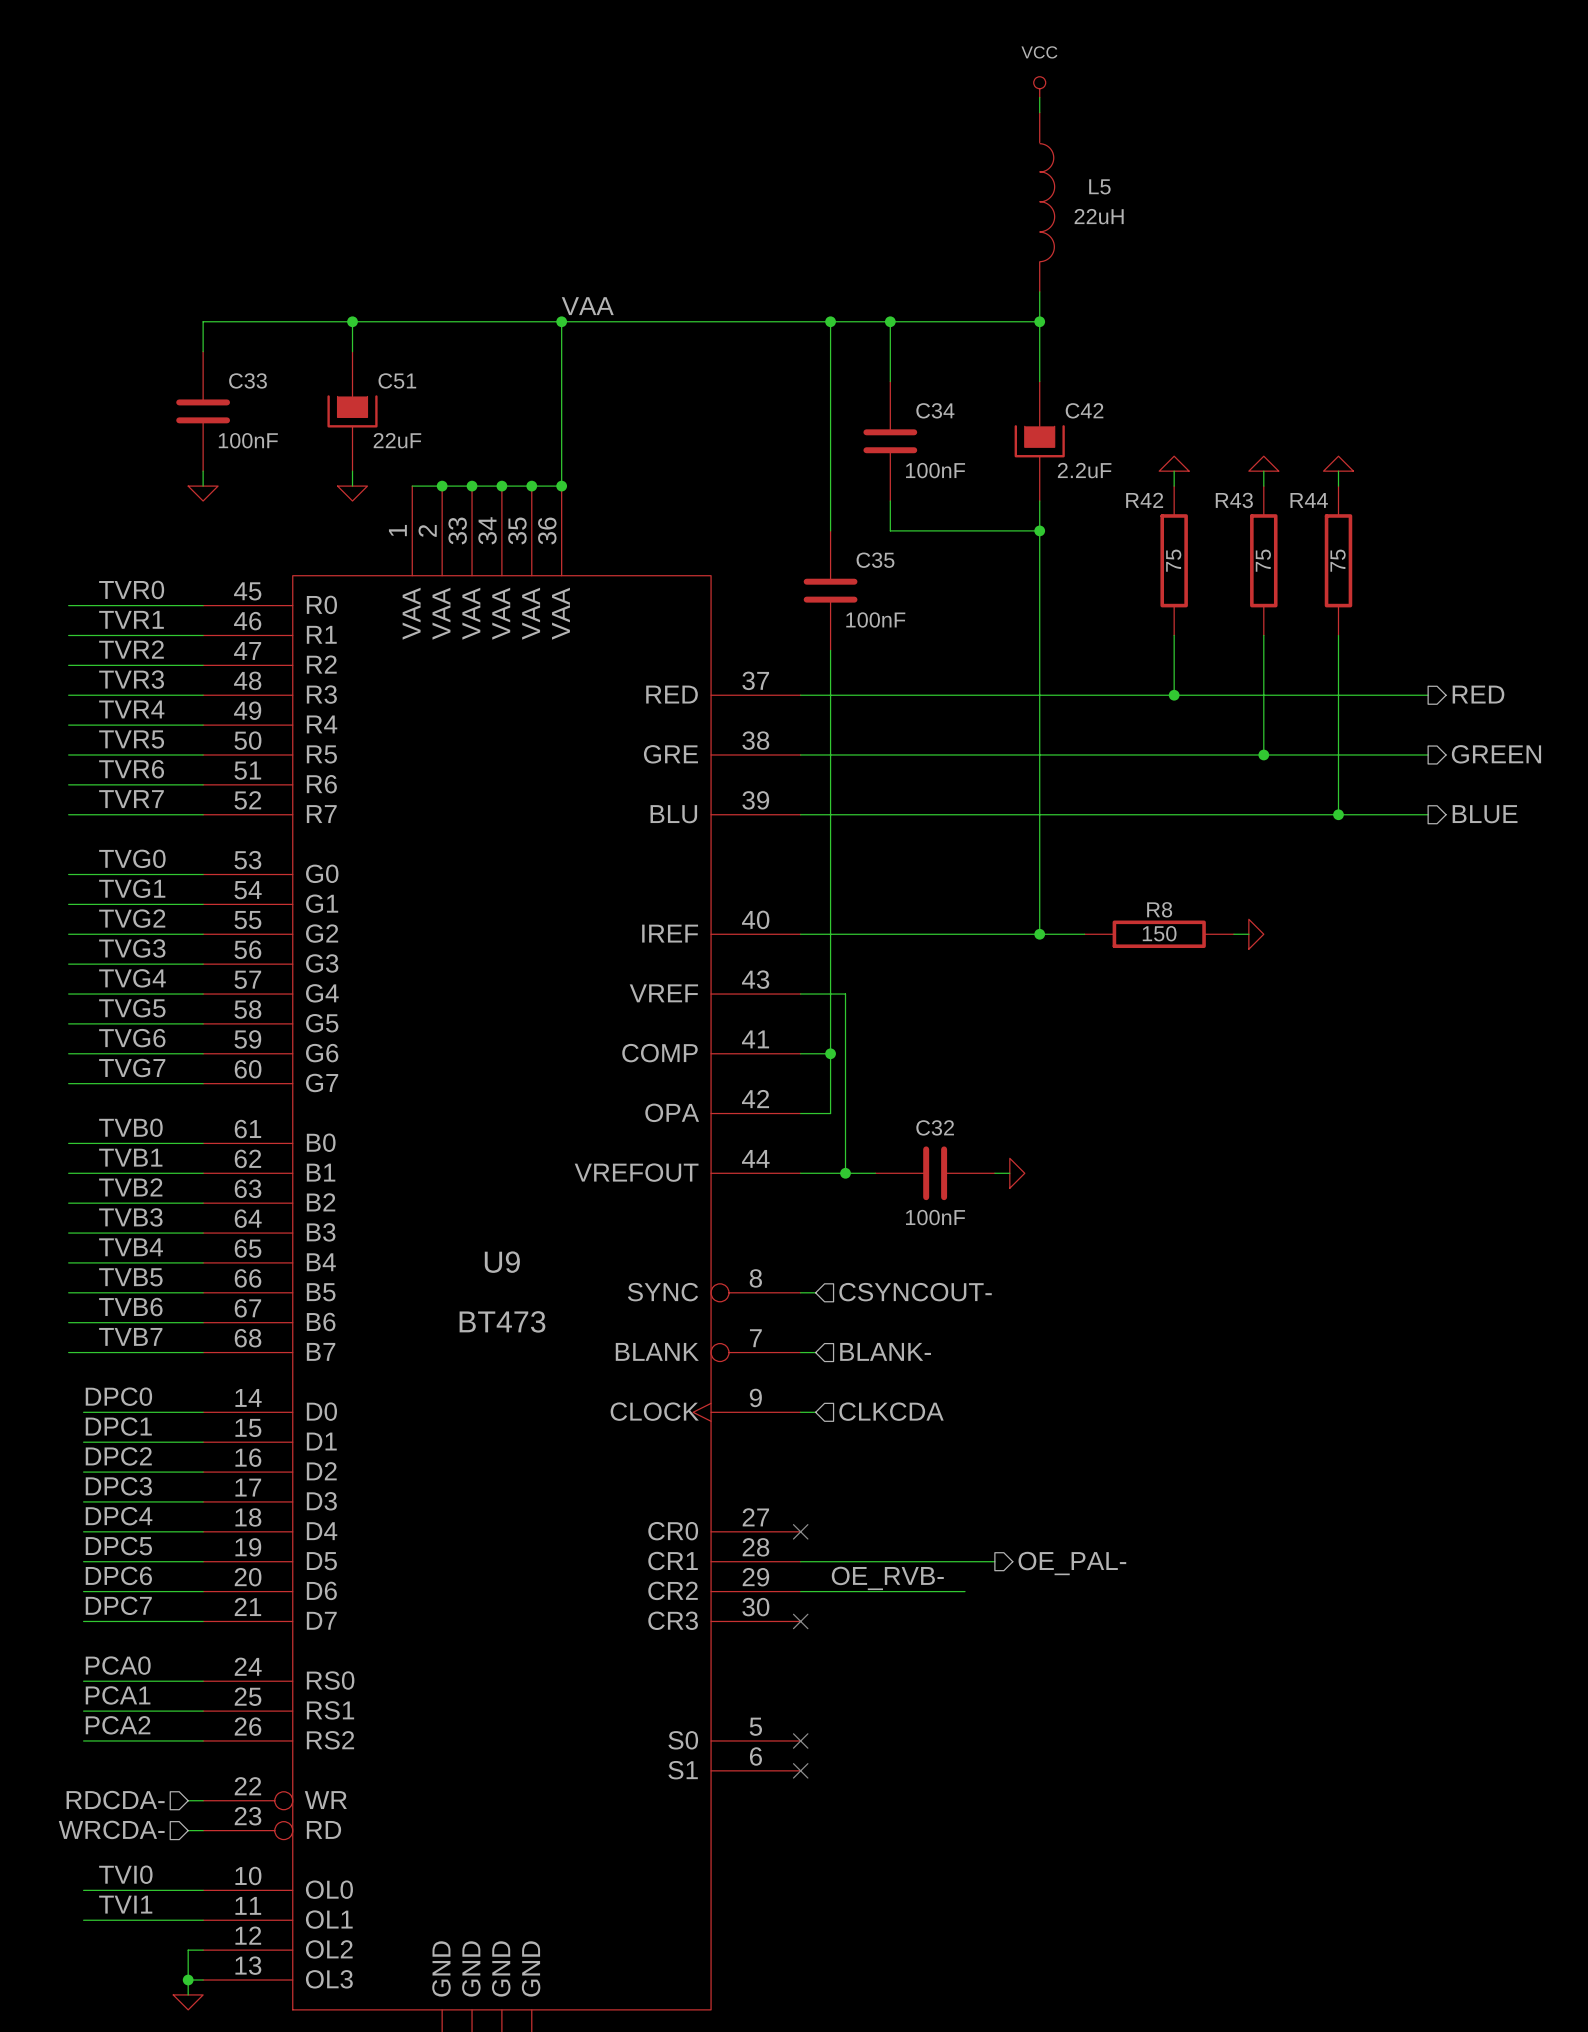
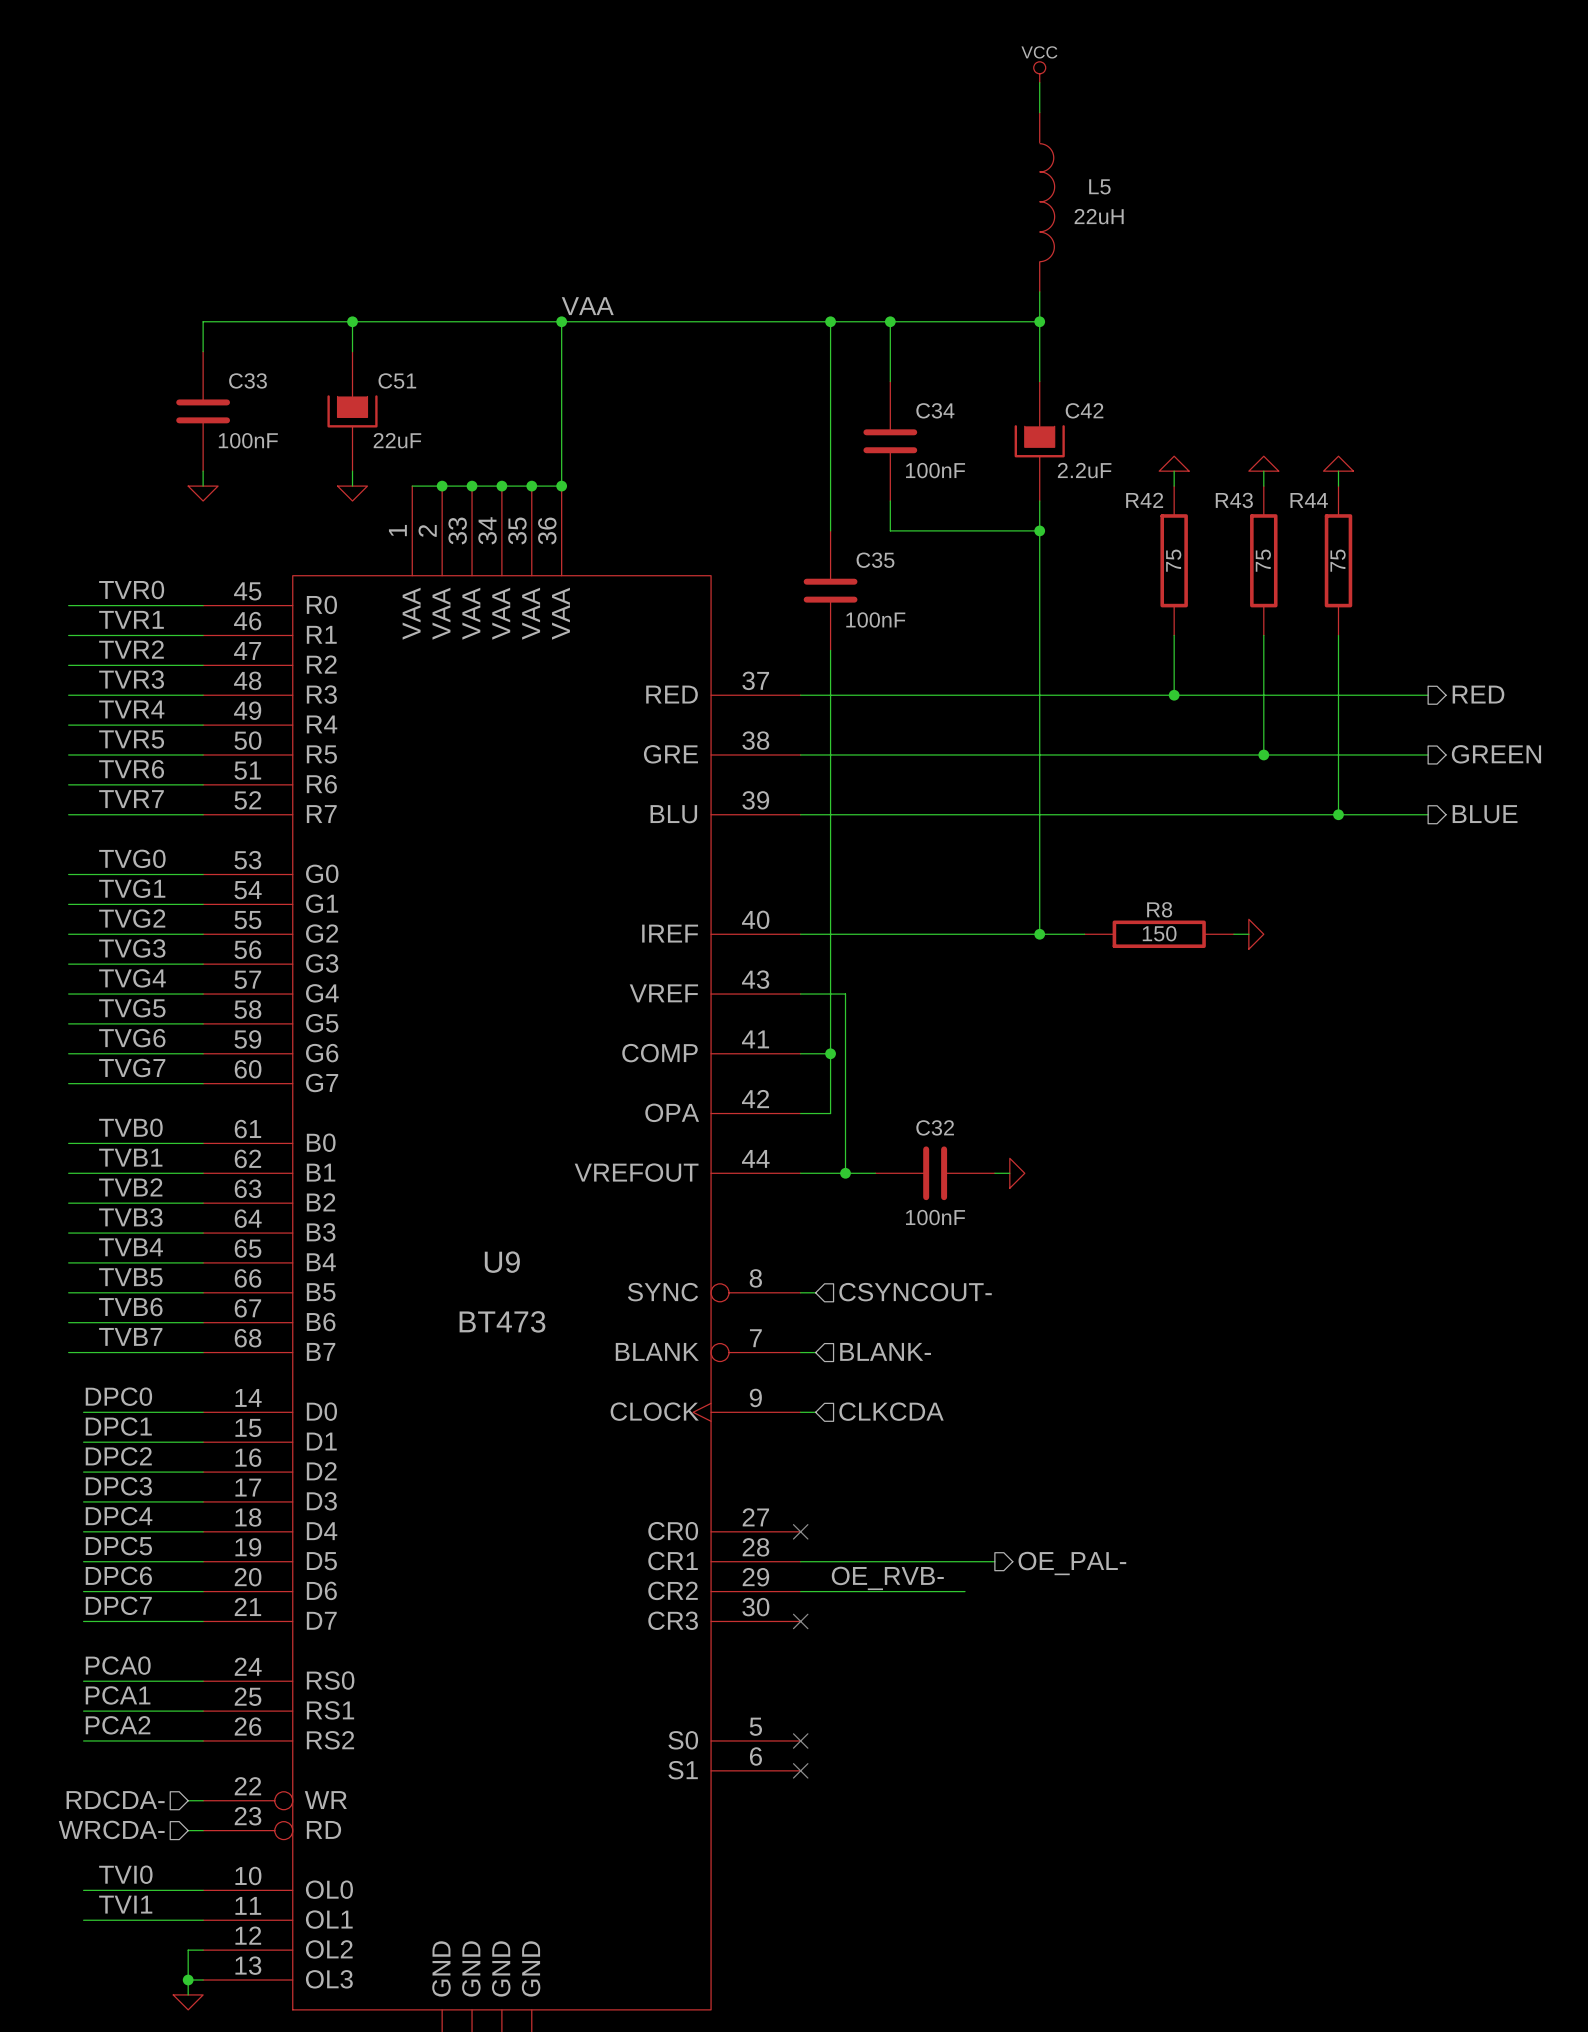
power symbol position: VCC (1039, 87) -> VCC (1039, 72)

